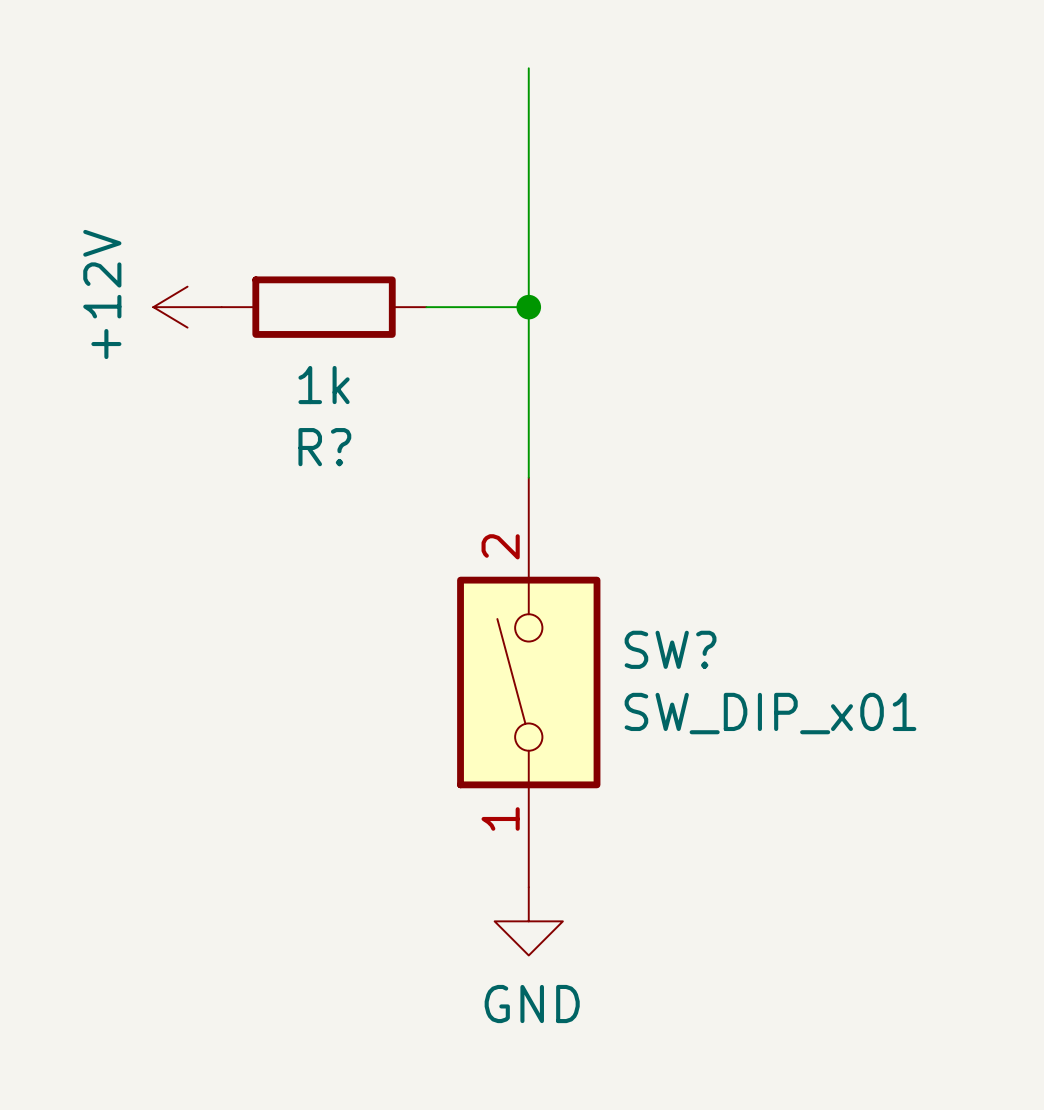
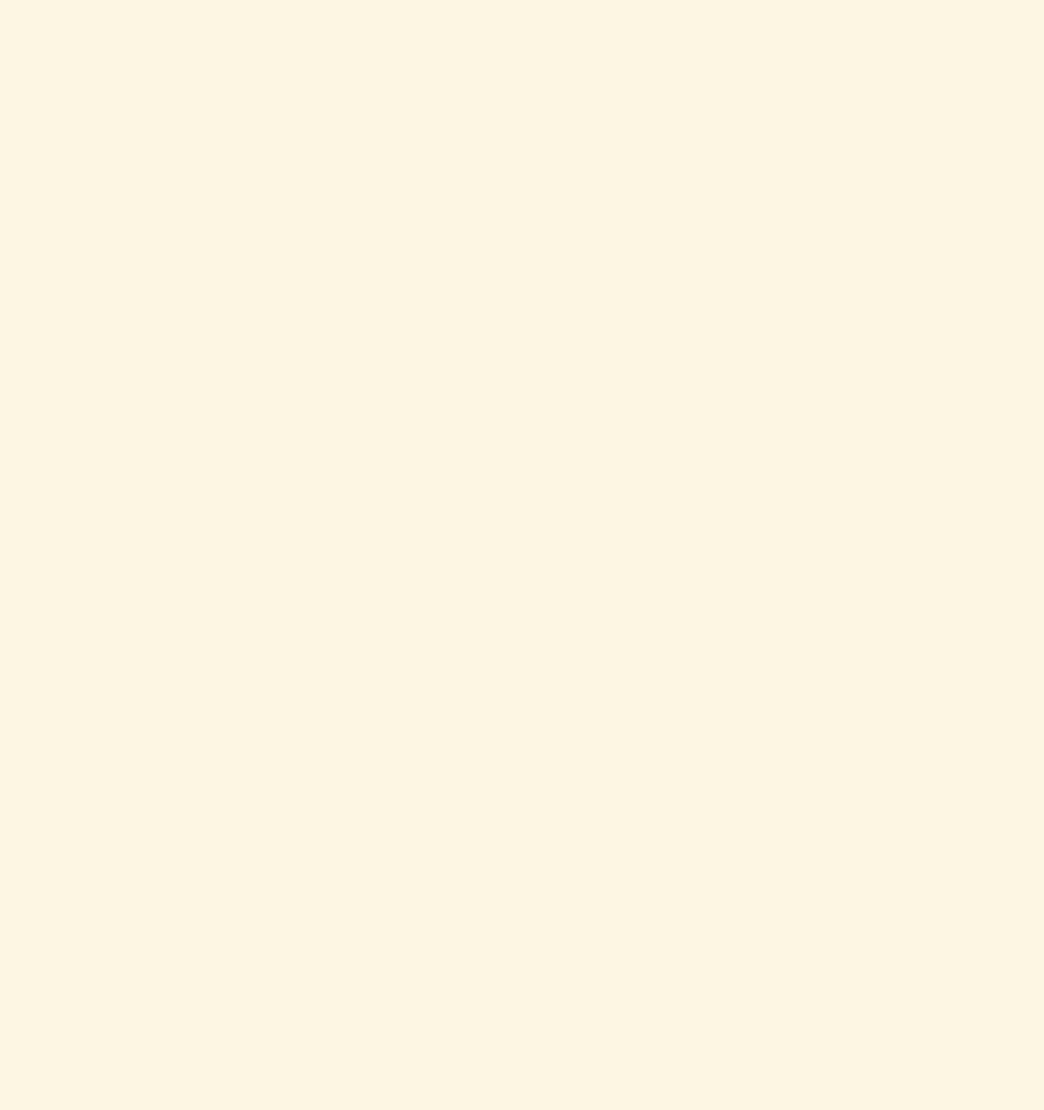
wire: (528, 68) (528, 477) -> none
power symbol: +12V (187, 307) -> none
R?: 1k (324, 307) -> none
wire: (426, 307) (528, 307) -> none
junction: (528, 307) -> none
SW?: SW_DIP_x01 (528, 682) -> none
power symbol: GND (528, 921) -> none

